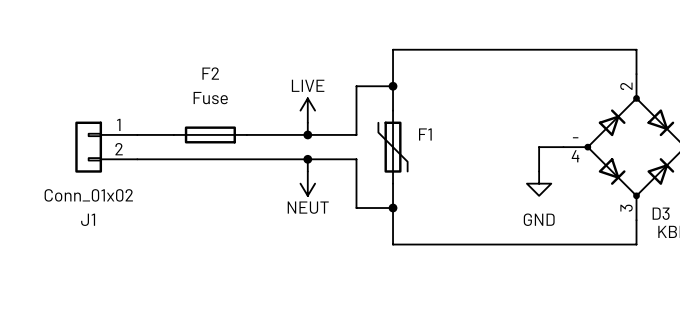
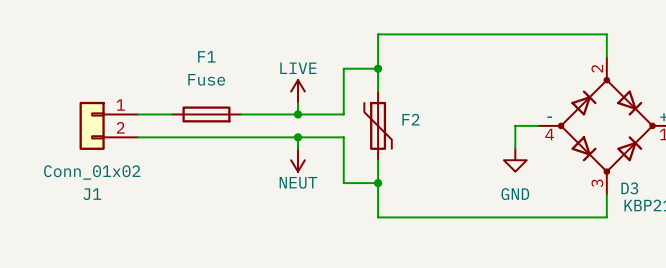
F2 name: F2 (210, 73) -> F1 (206, 56)
F1 name: F1 (425, 134) -> F2 (411, 119)

